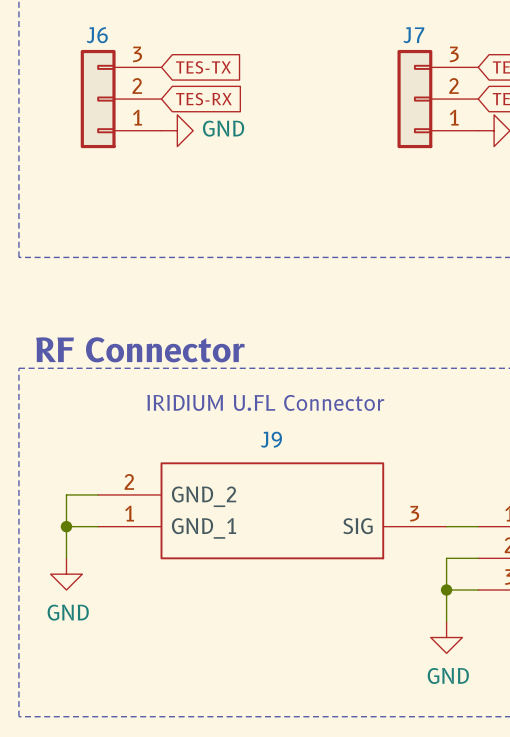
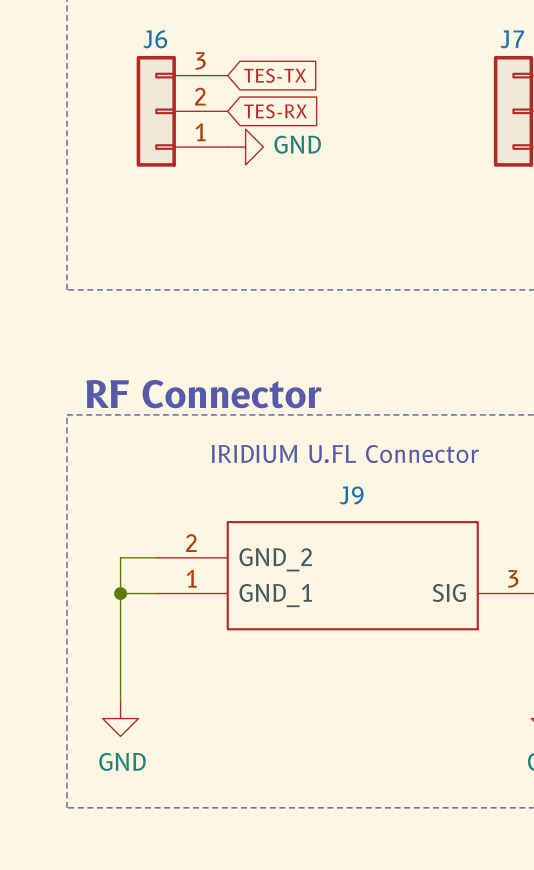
wire: none -> (120, 629) (120, 700)
power symbol position: GND (66, 574) -> GND (120, 718)

